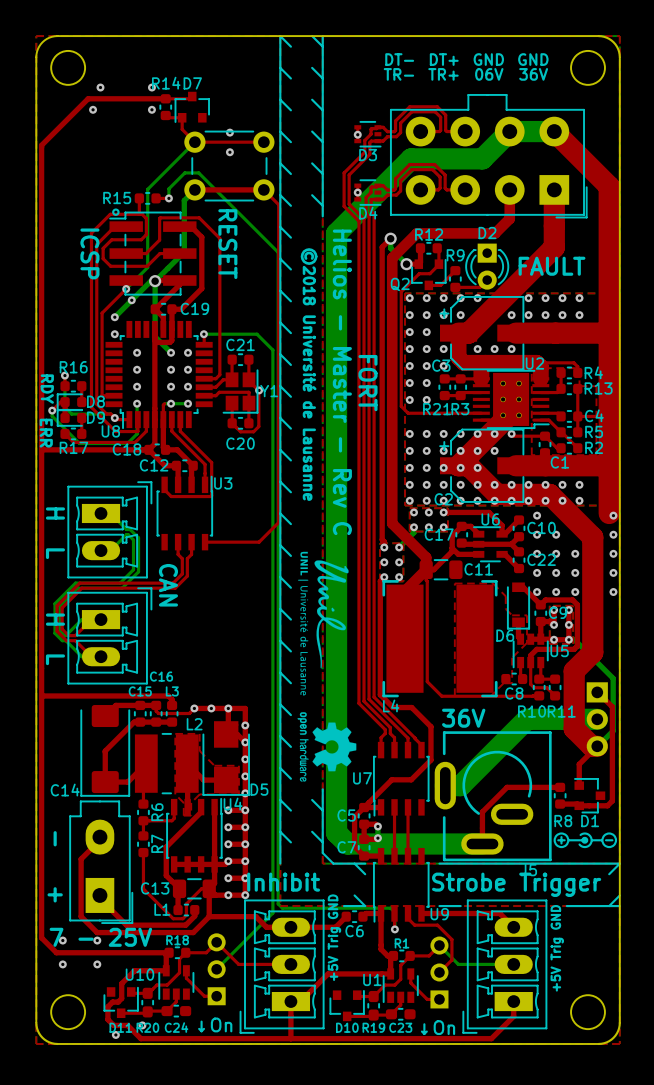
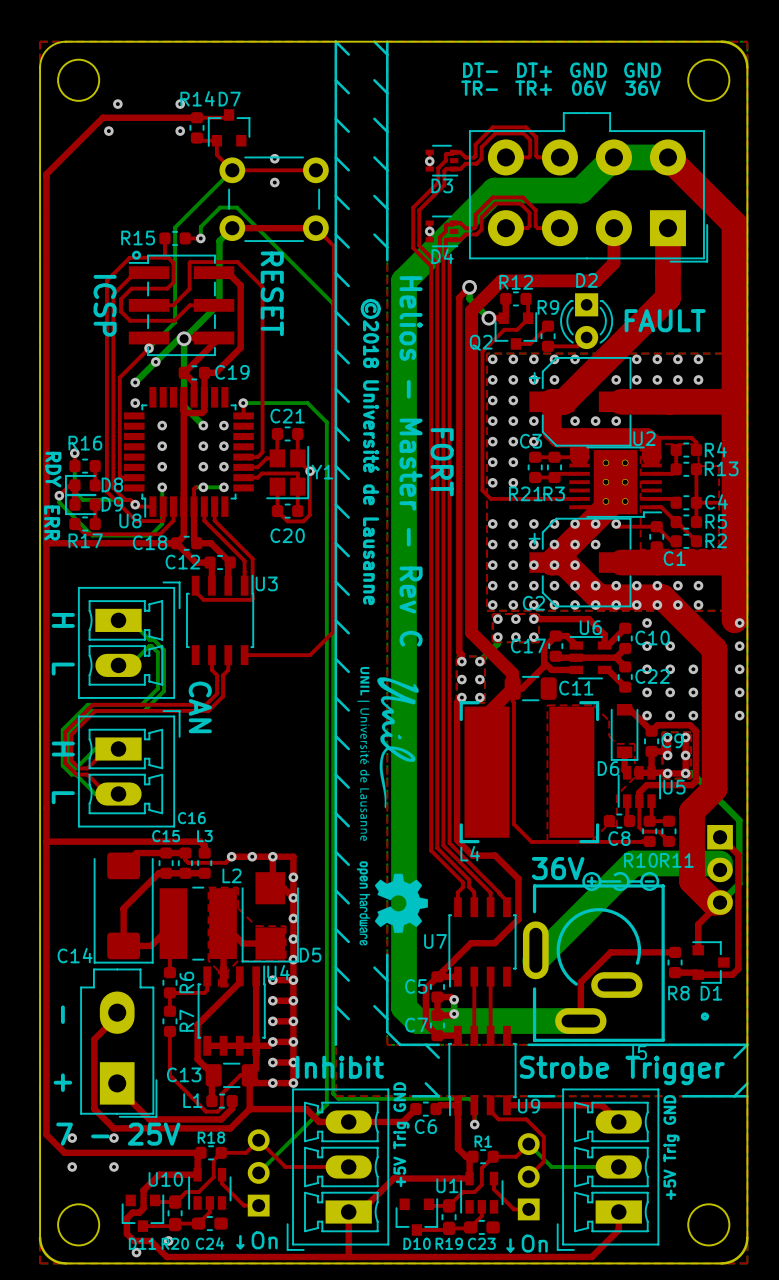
bottom track: none -> (720, 863) (632, 863) (535, 961)
bottom track: (597, 719) (526, 719) (460, 785) (445, 785) -> none
drawing: none -> [582, 871, 602, 892]
drawing: none -> [640, 871, 660, 892]
drawing: [553, 832, 570, 849] -> none
drawing: [601, 832, 618, 849] -> none
line: (580, 834) (588, 834) (591, 841) (586, 846) (579, 844) -> (614, 875) (624, 874) (628, 882) (622, 889) (613, 886)
line: (561, 837) (561, 843) -> (591, 877) (591, 885)
line: (558, 840) (564, 840) -> (587, 881) (595, 881)
line: (568, 840) (584, 840) -> (600, 881) (620, 881)
line: (592, 840) (601, 840) -> (629, 881) (640, 881)
line: (606, 840) (612, 840) -> (645, 881) (653, 881)

